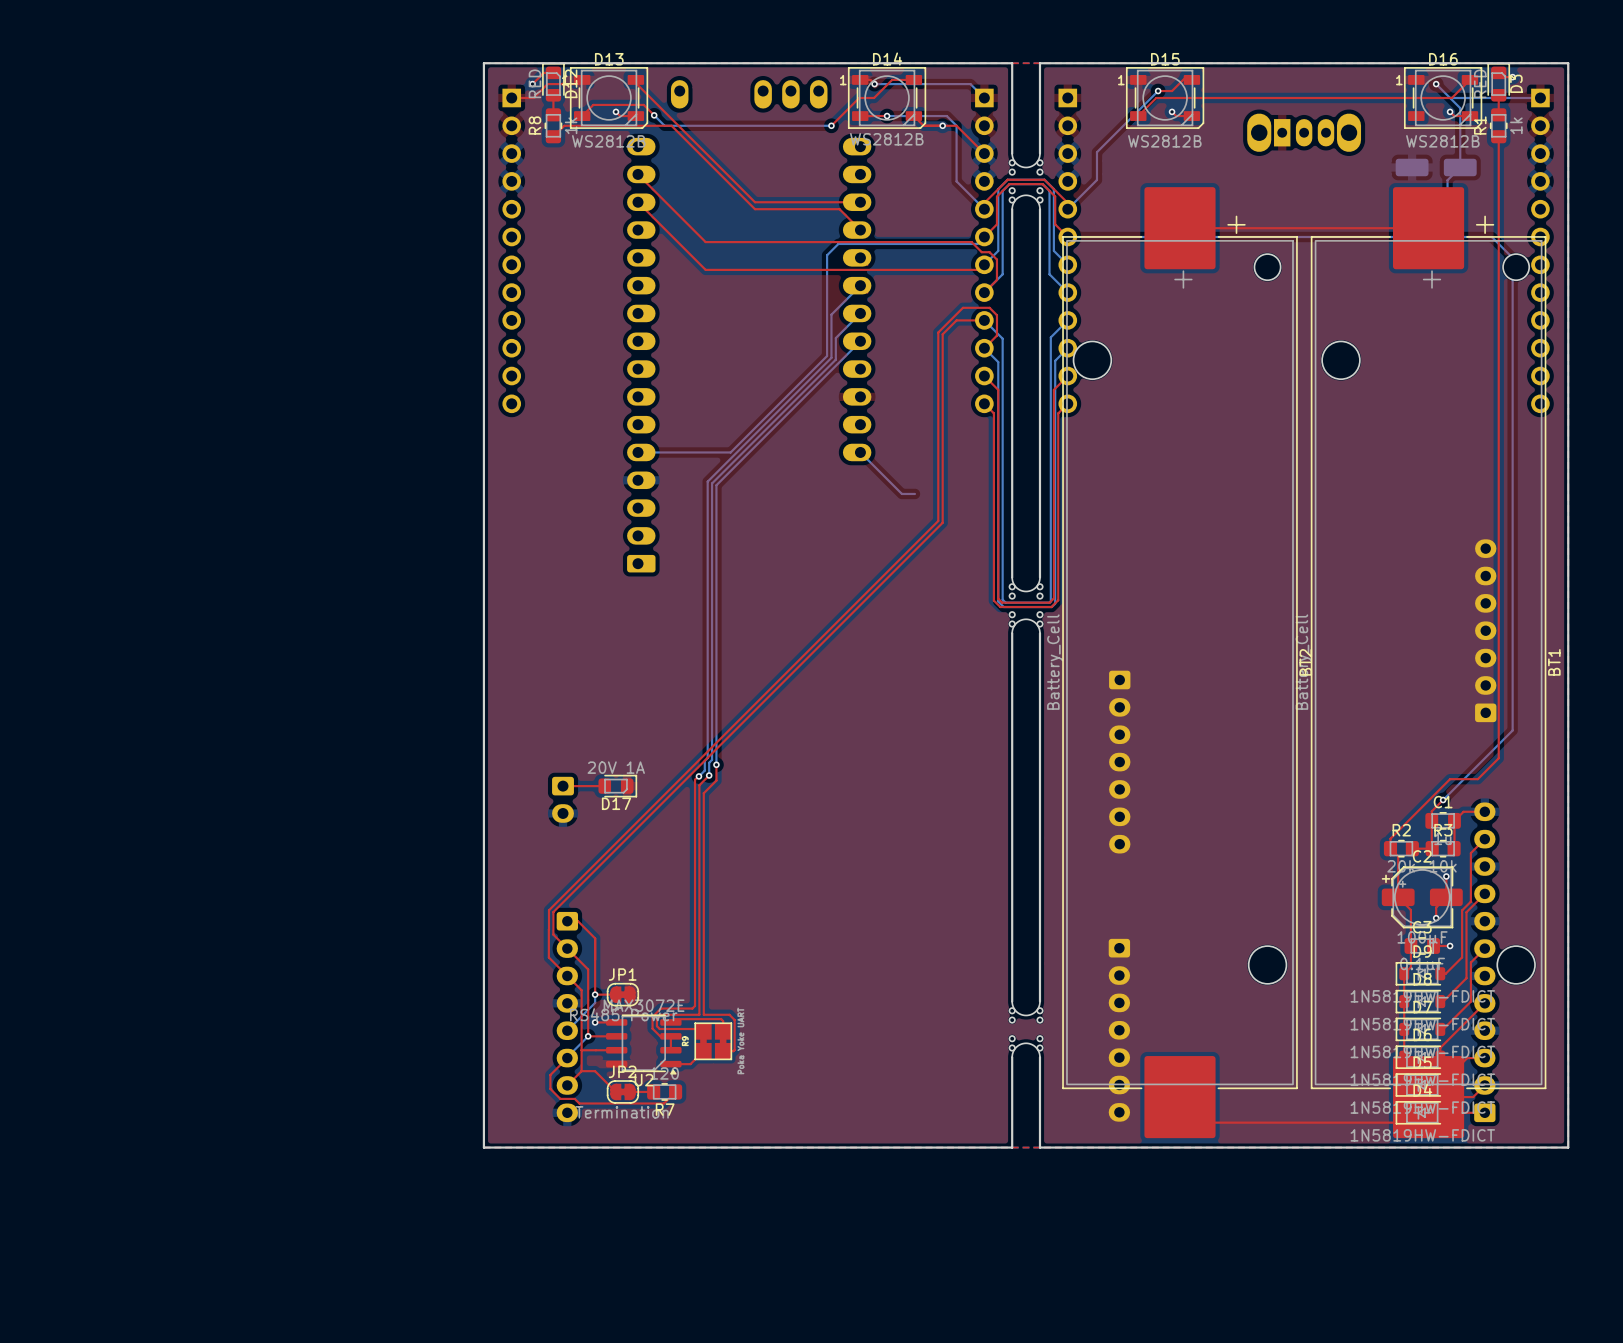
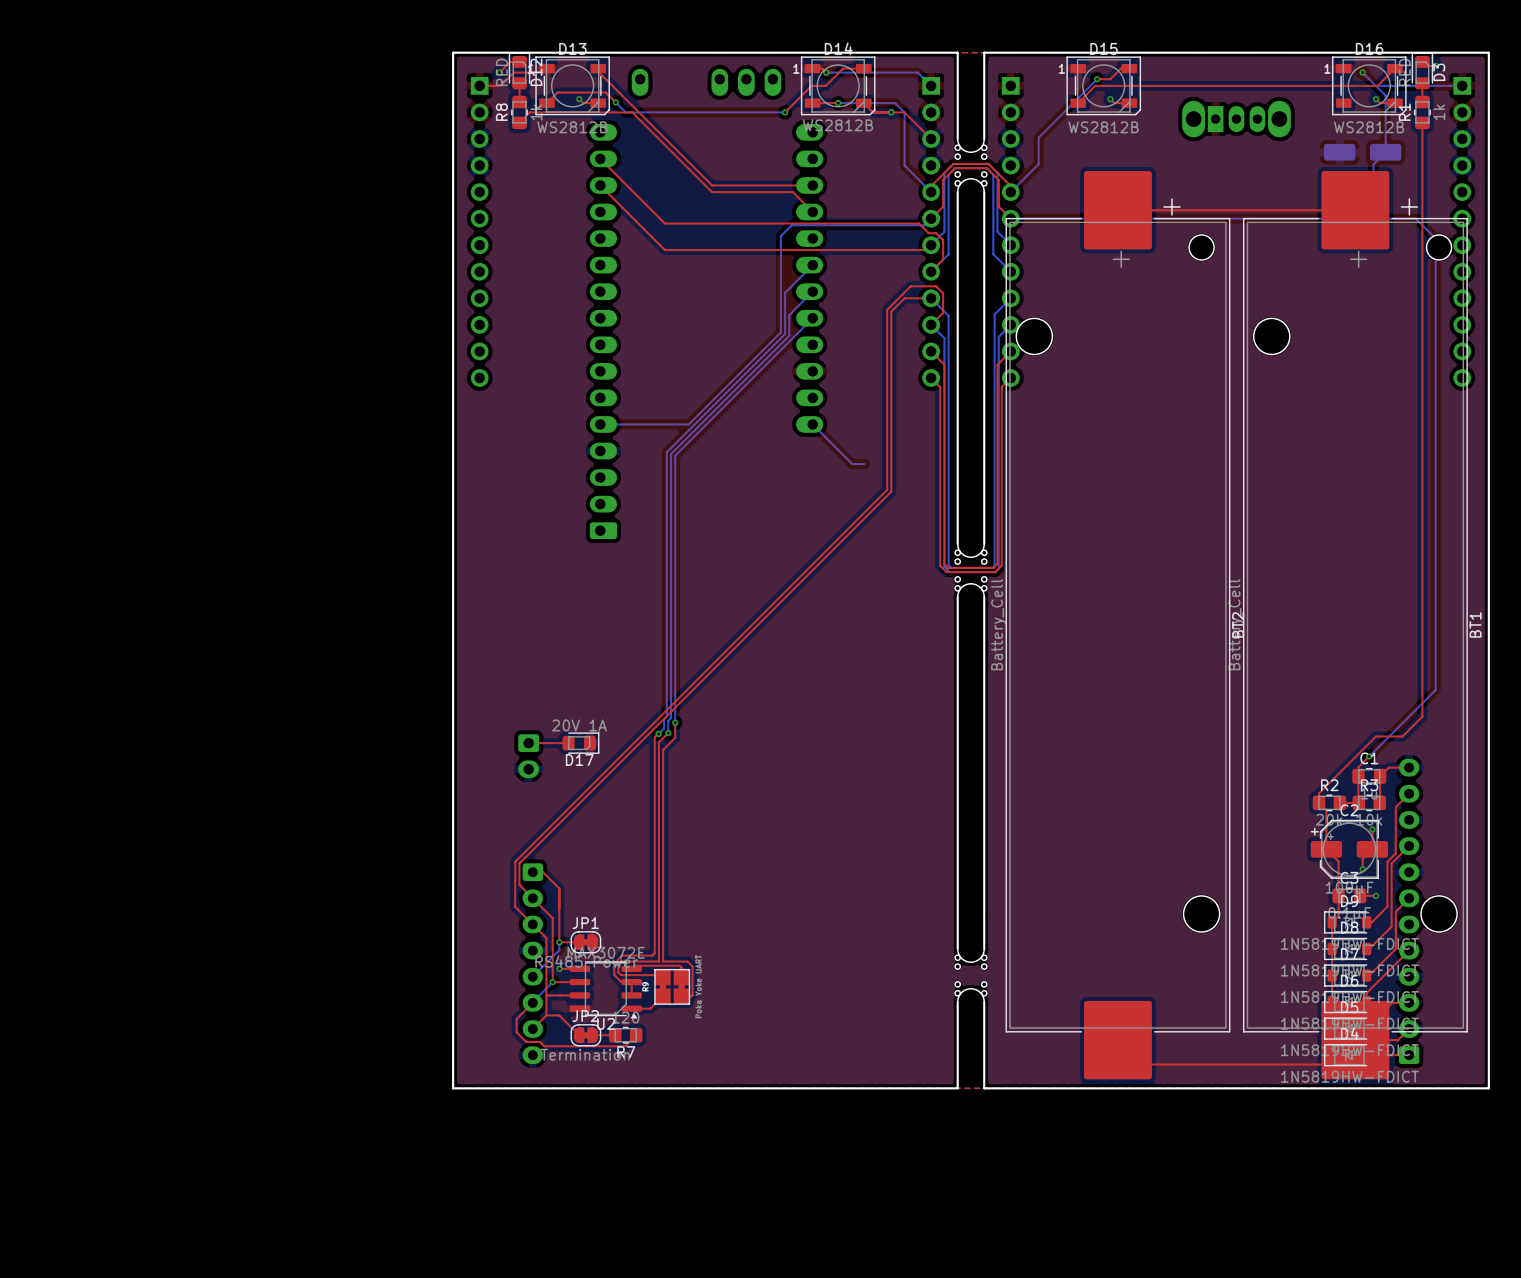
part: (1485, 630) -> none
part: (1119, 762) -> none
part: (1119, 1030) -> none

